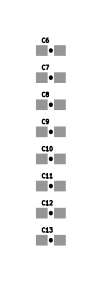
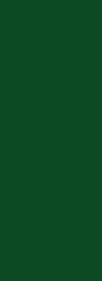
part: (50, 50) -> none
part: (50, 77) -> none
part: (50, 104) -> none
part: (50, 131) -> none
part: (50, 158) -> none
part: (50, 186) -> none
part: (50, 213) -> none
part: (50, 240) -> none

